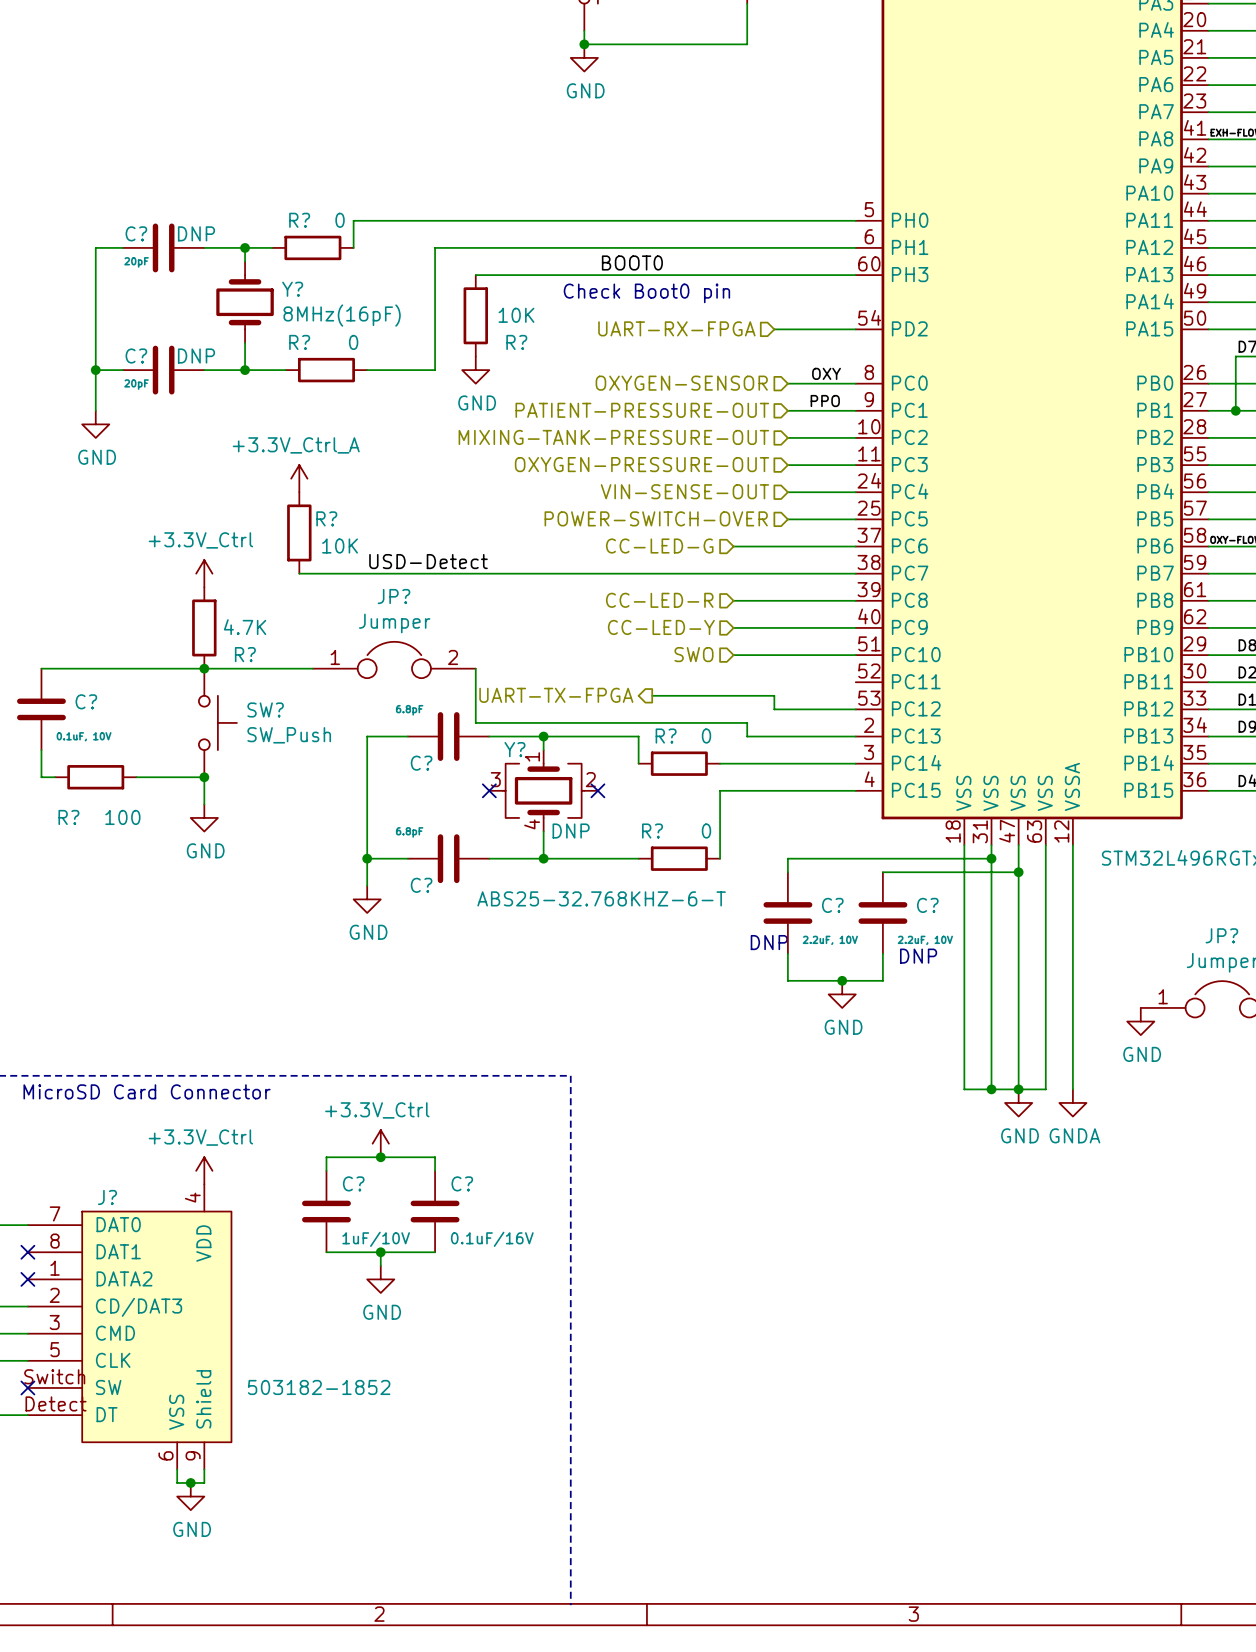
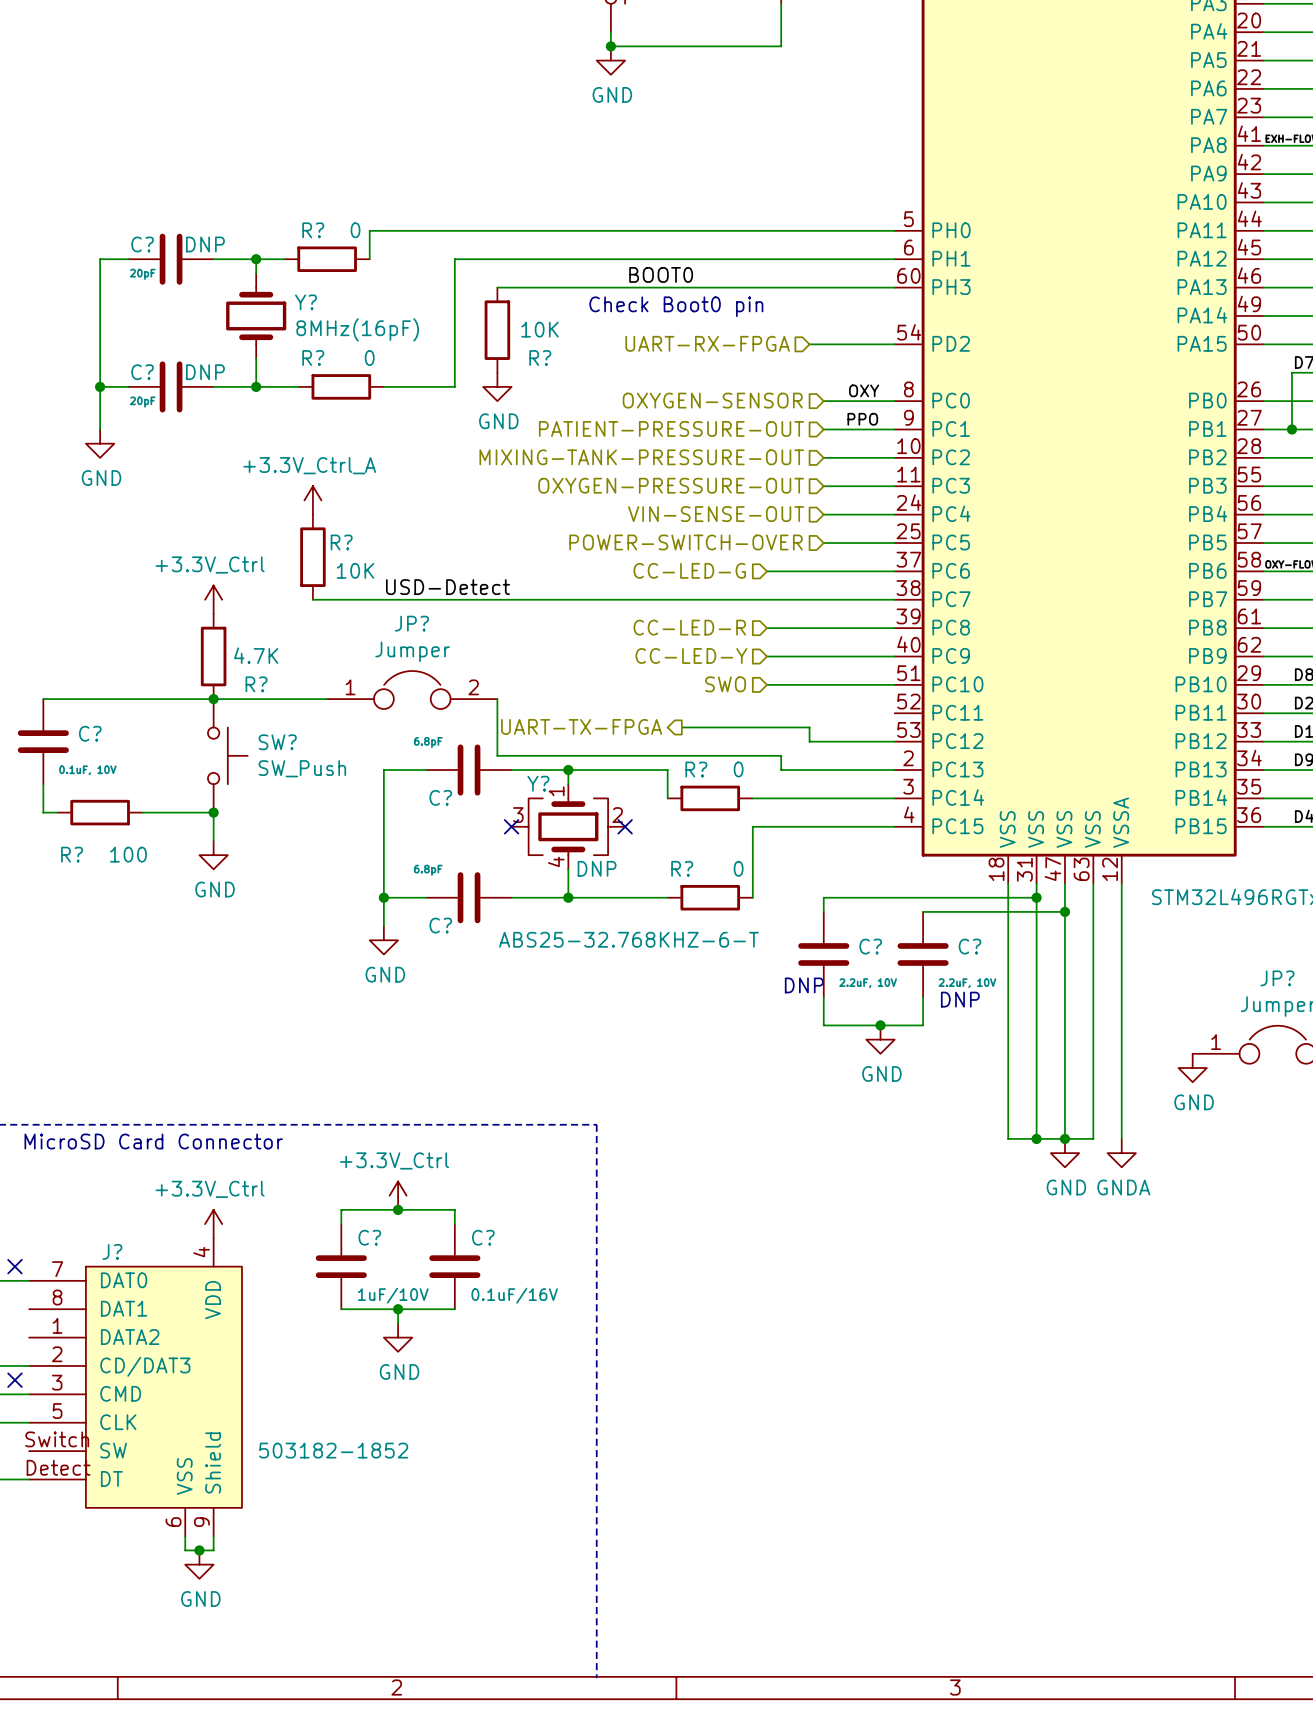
no-connect mark: none -> (14, 1266)
no-connect mark: (27, 1252) -> none
no-connect mark: (27, 1279) -> none
no-connect mark: none -> (14, 1380)
no-connect mark: (27, 1387) -> none

